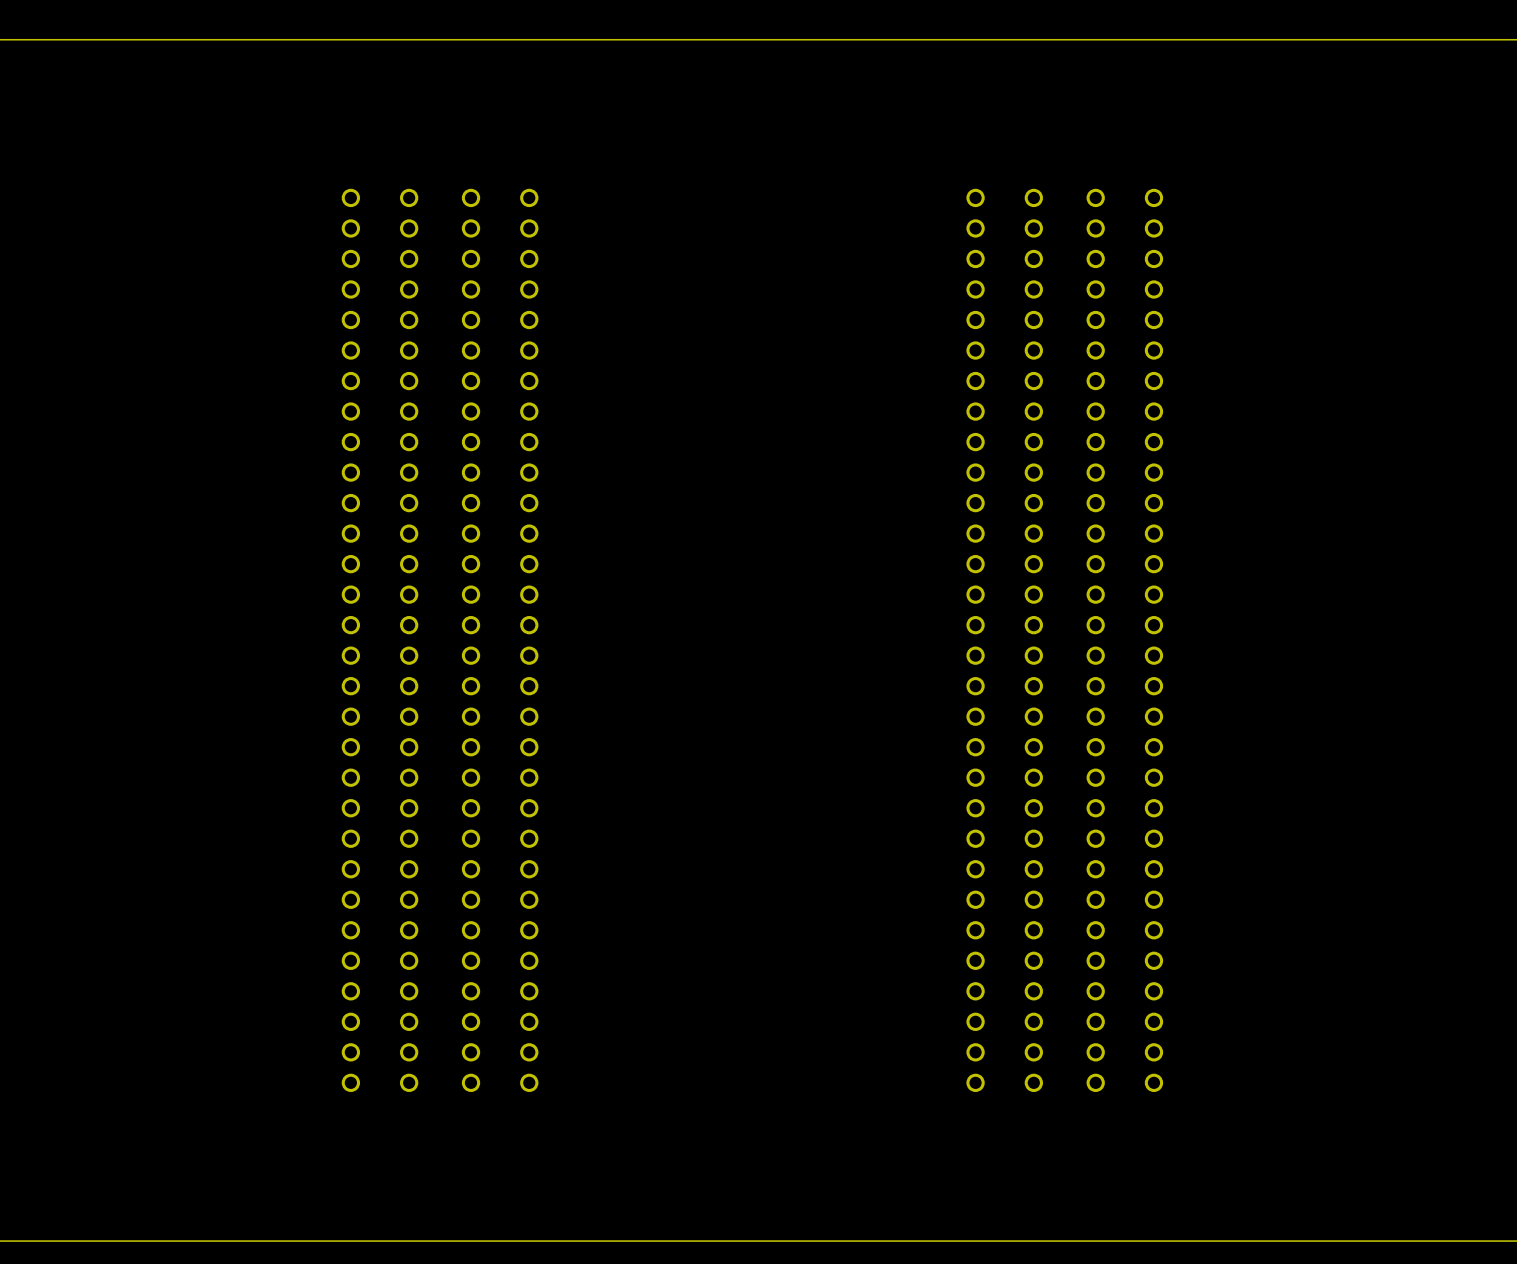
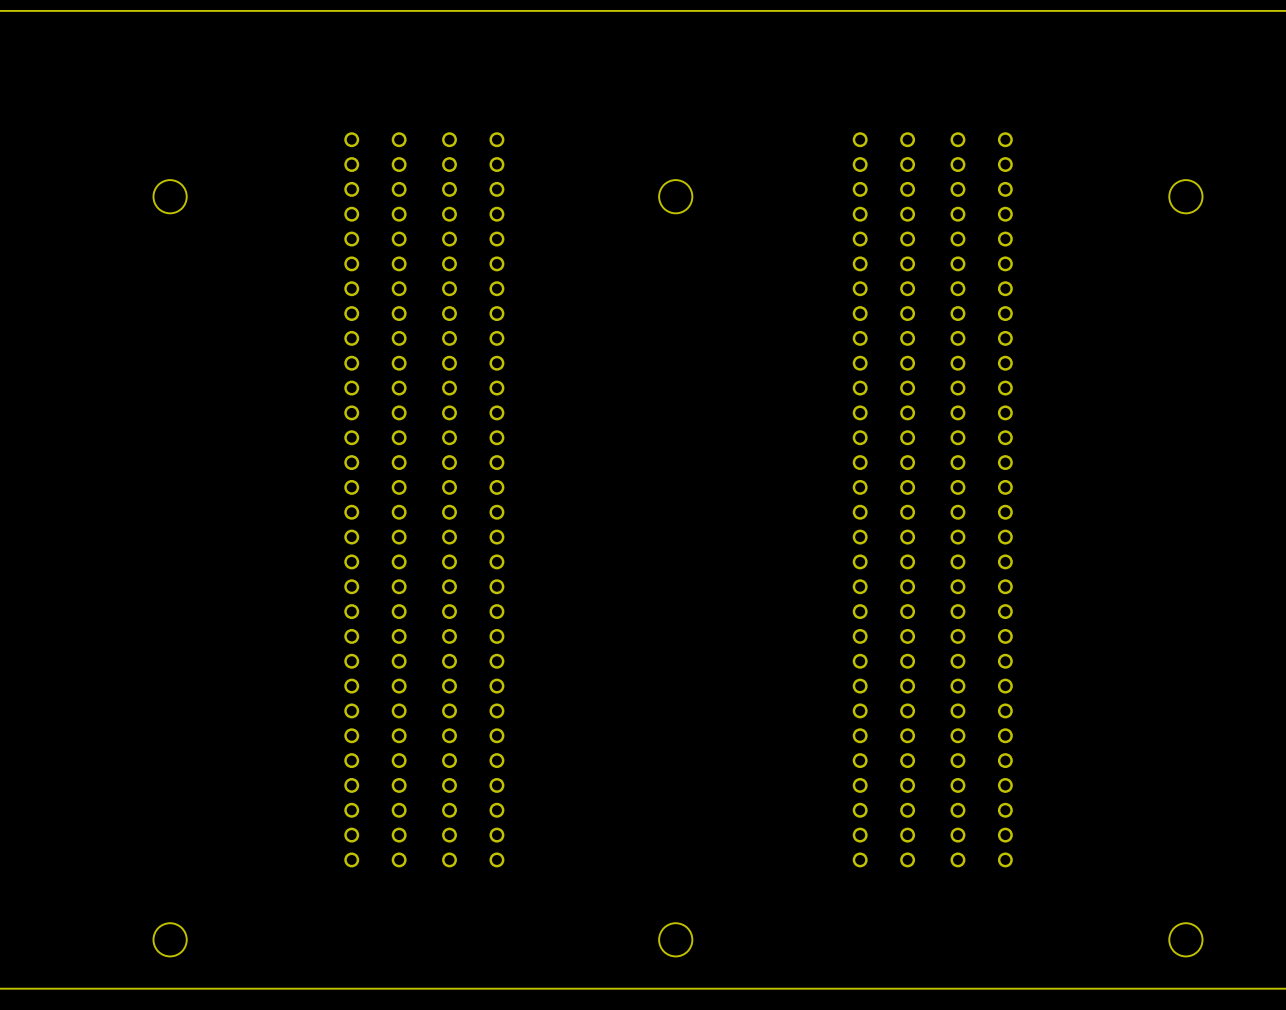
round board edge: none -> [153, 179, 187, 214]
round board edge: none -> [658, 179, 693, 214]
round board edge: none -> [1169, 179, 1203, 214]
round board edge: none -> [153, 922, 187, 957]
round board edge: none -> [658, 922, 693, 957]
round board edge: none -> [1169, 922, 1203, 957]

